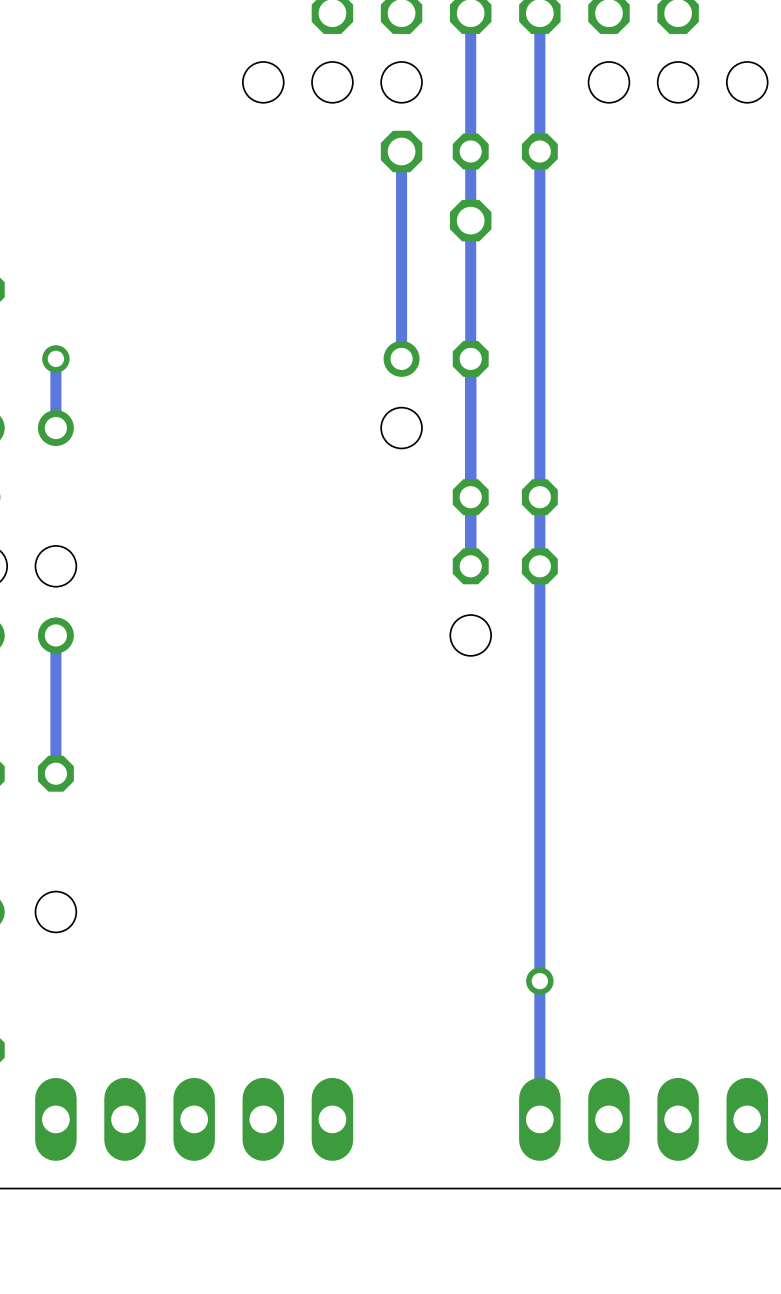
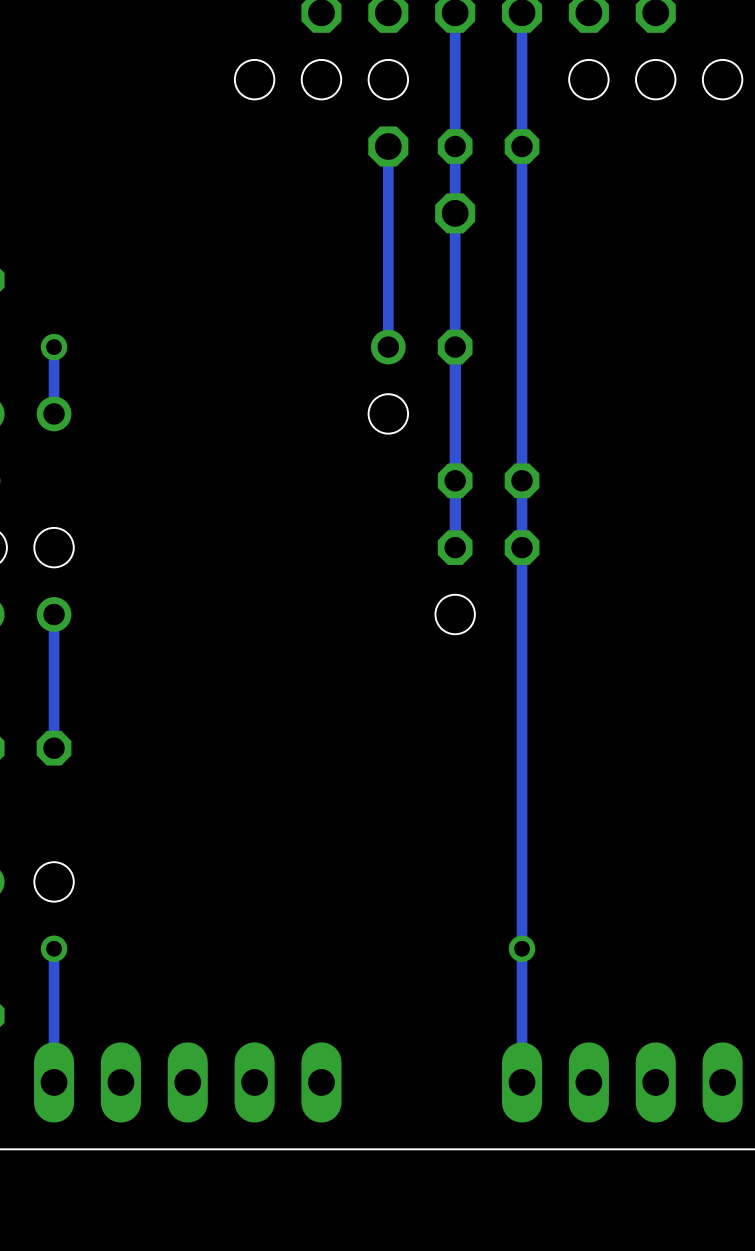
track: none -> (54, 948) (54, 1082)
via: none -> (54, 948)

